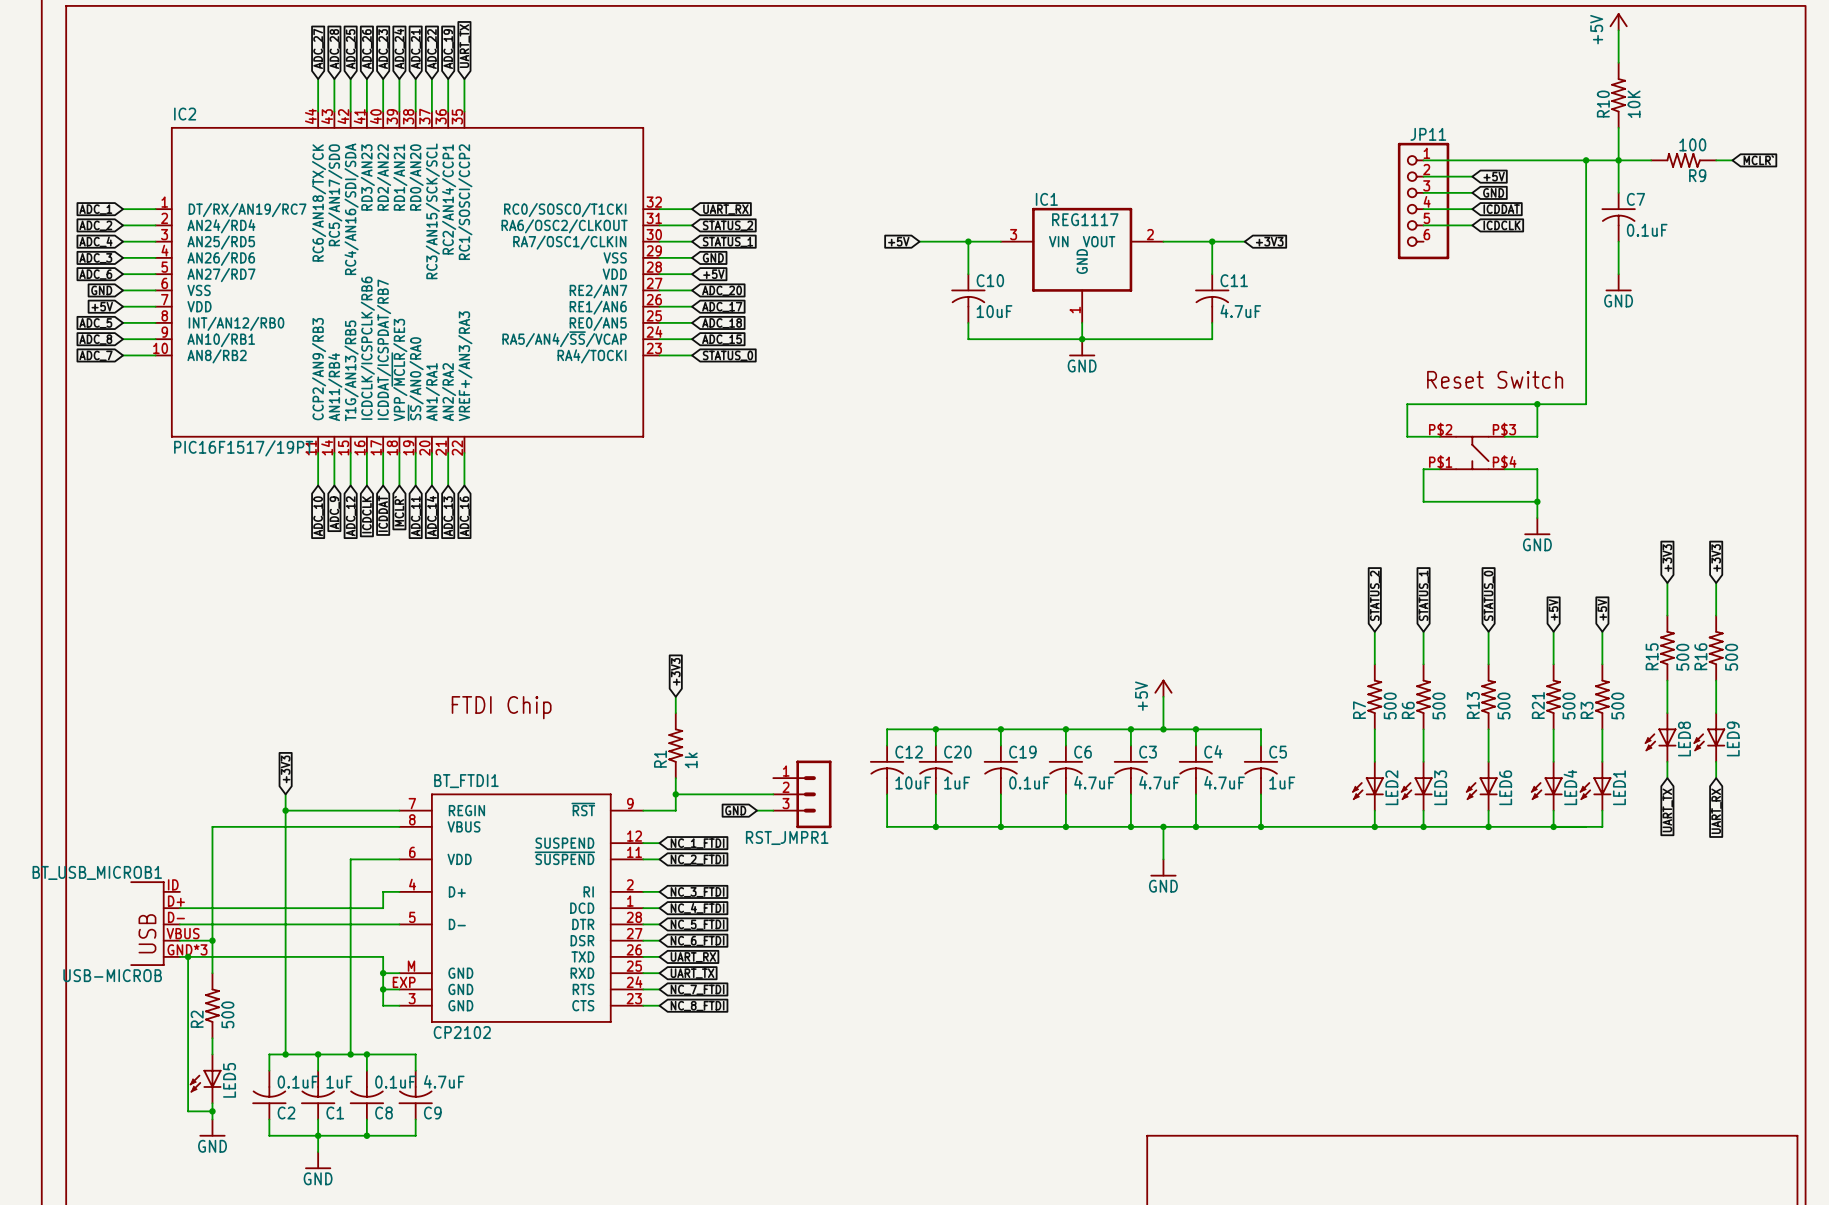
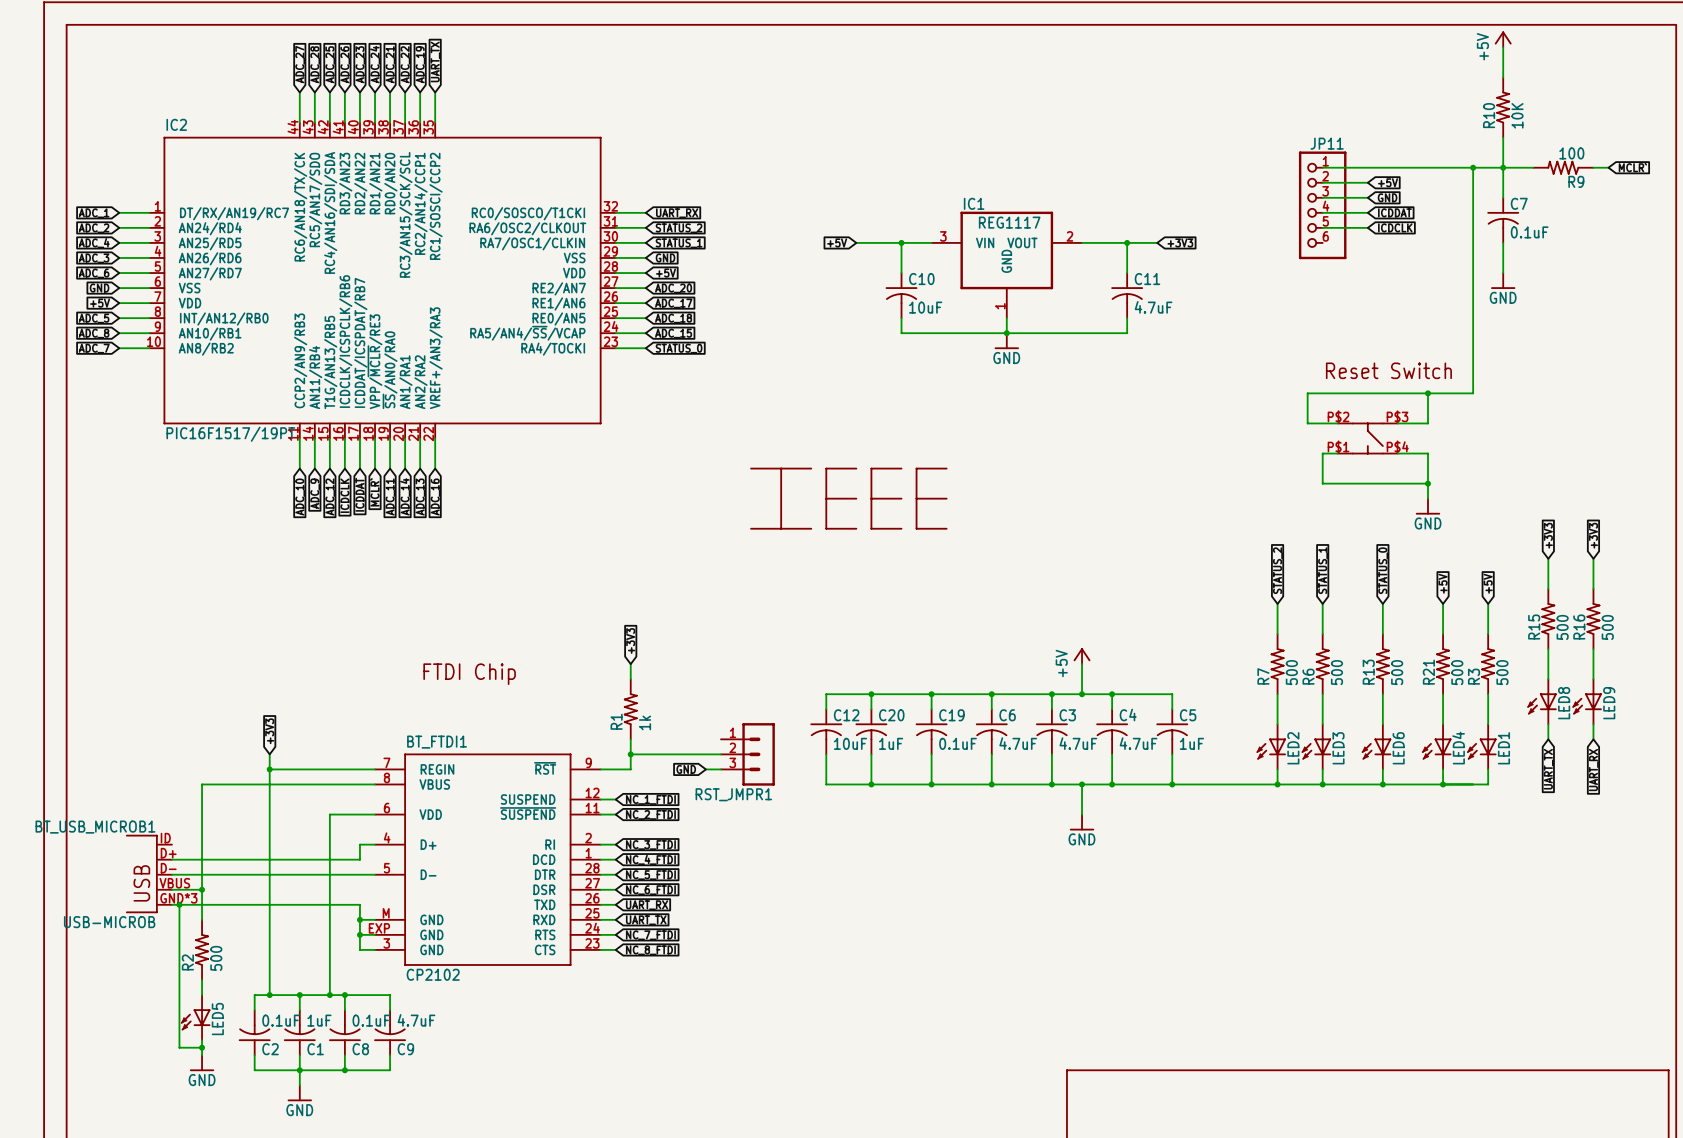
part: none -> (848, 498)

